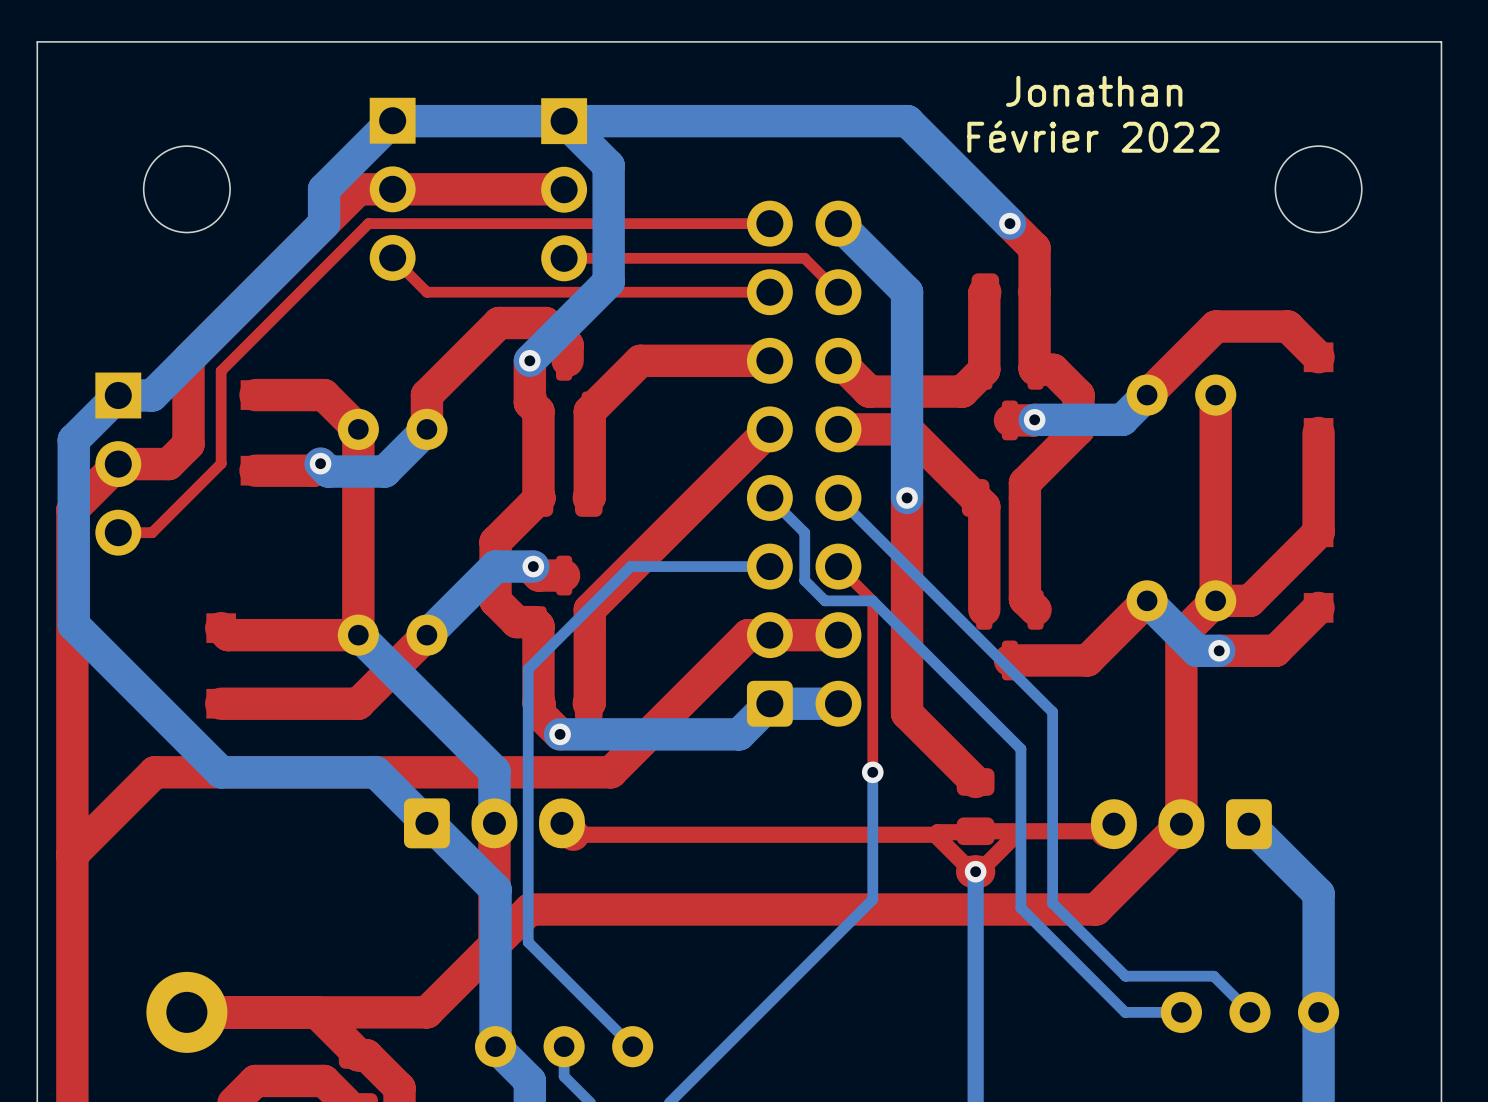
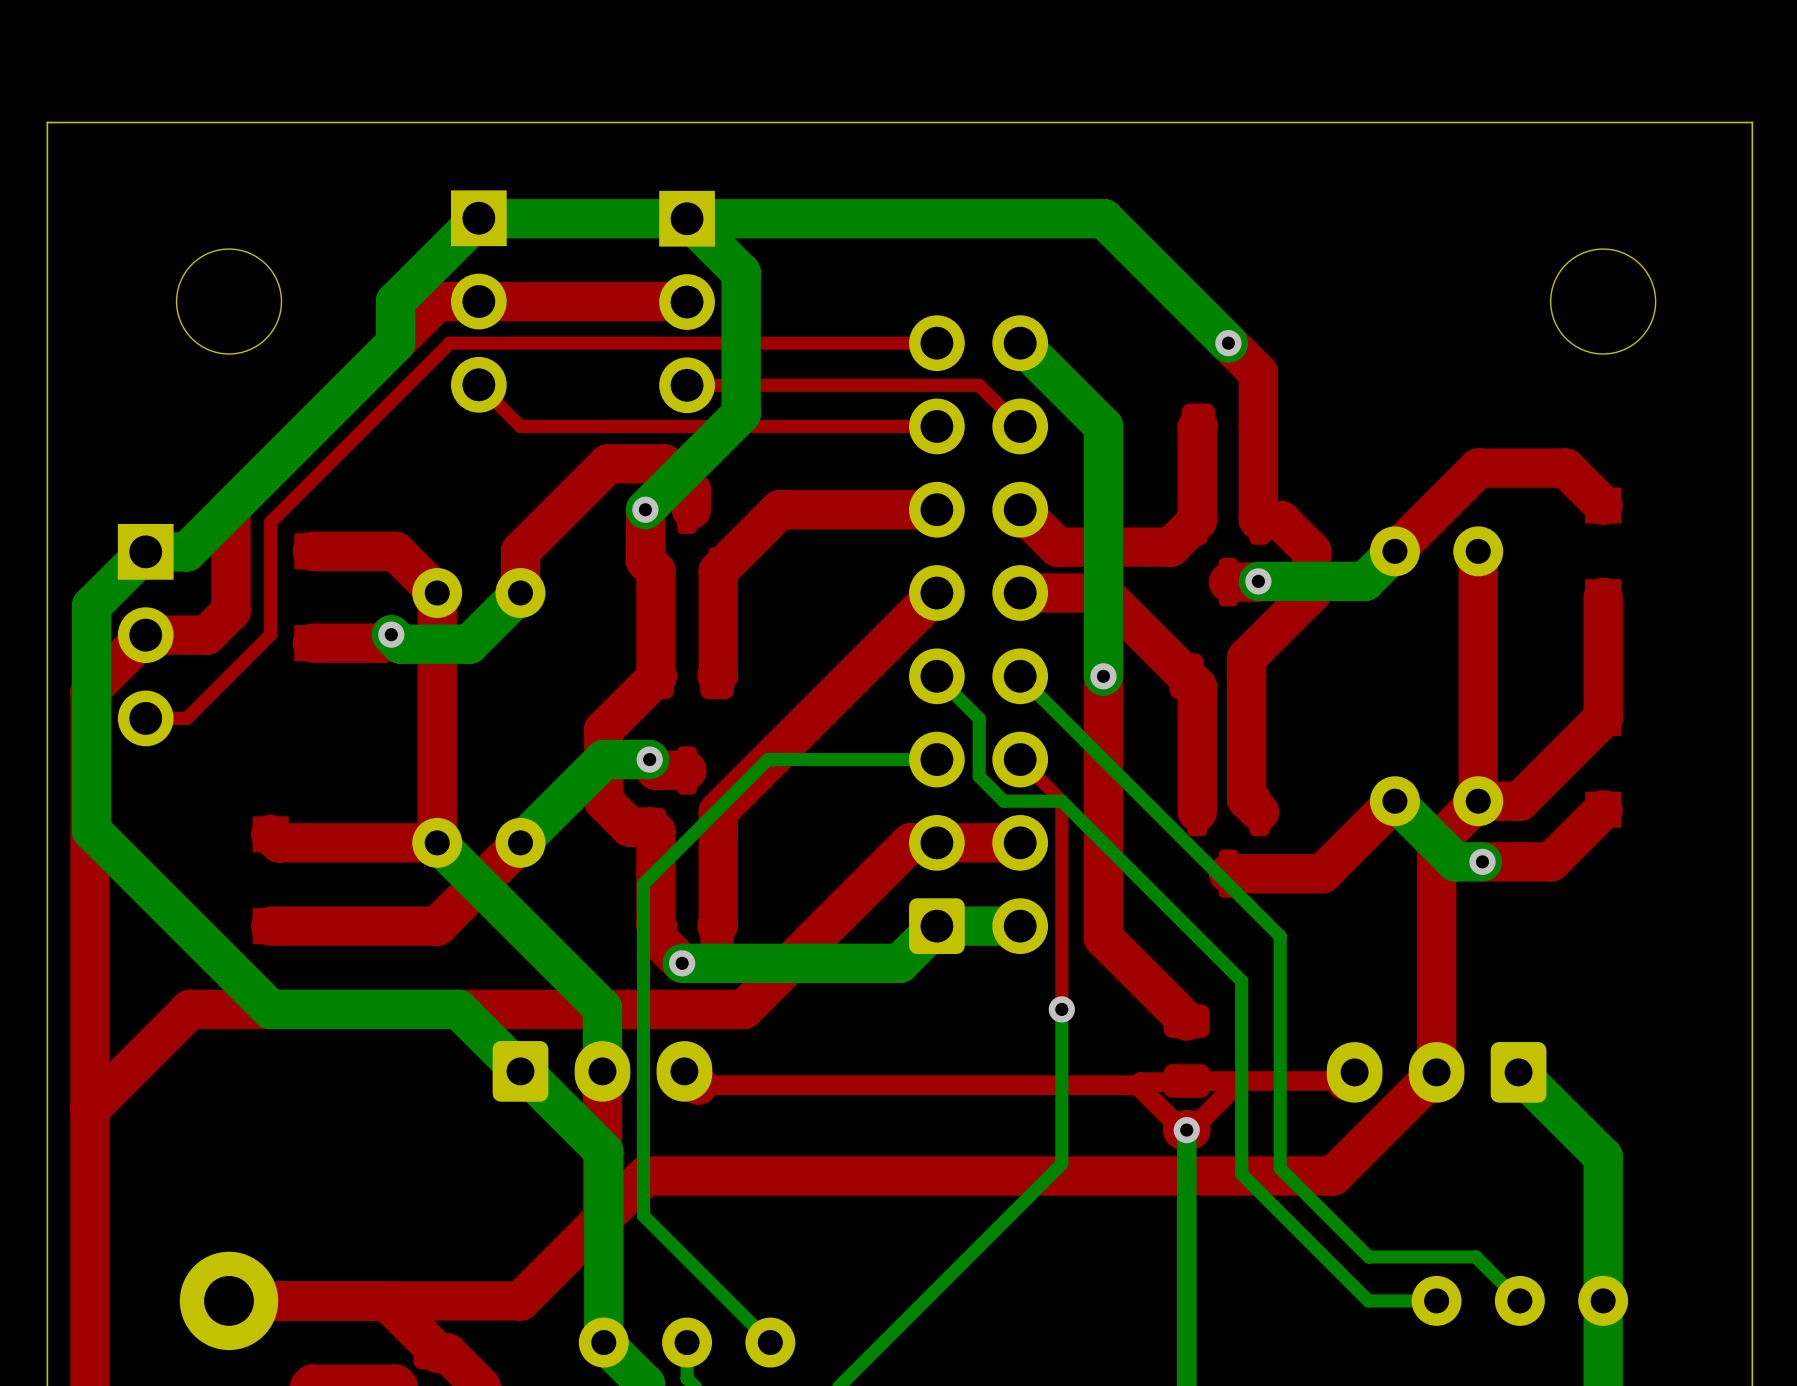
text: Jonathan (1094, 91) -> none
text: Février 2022 (1093, 136) -> none

